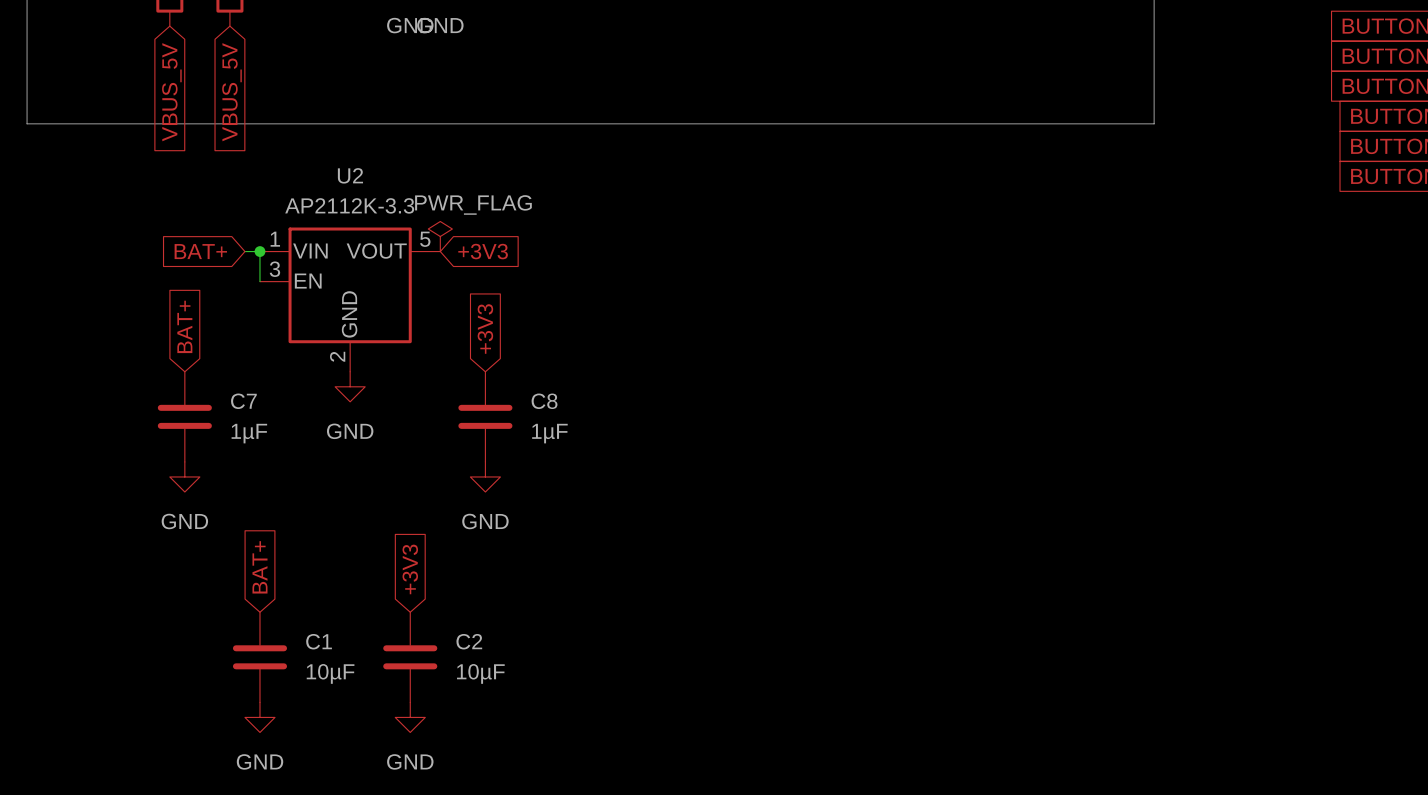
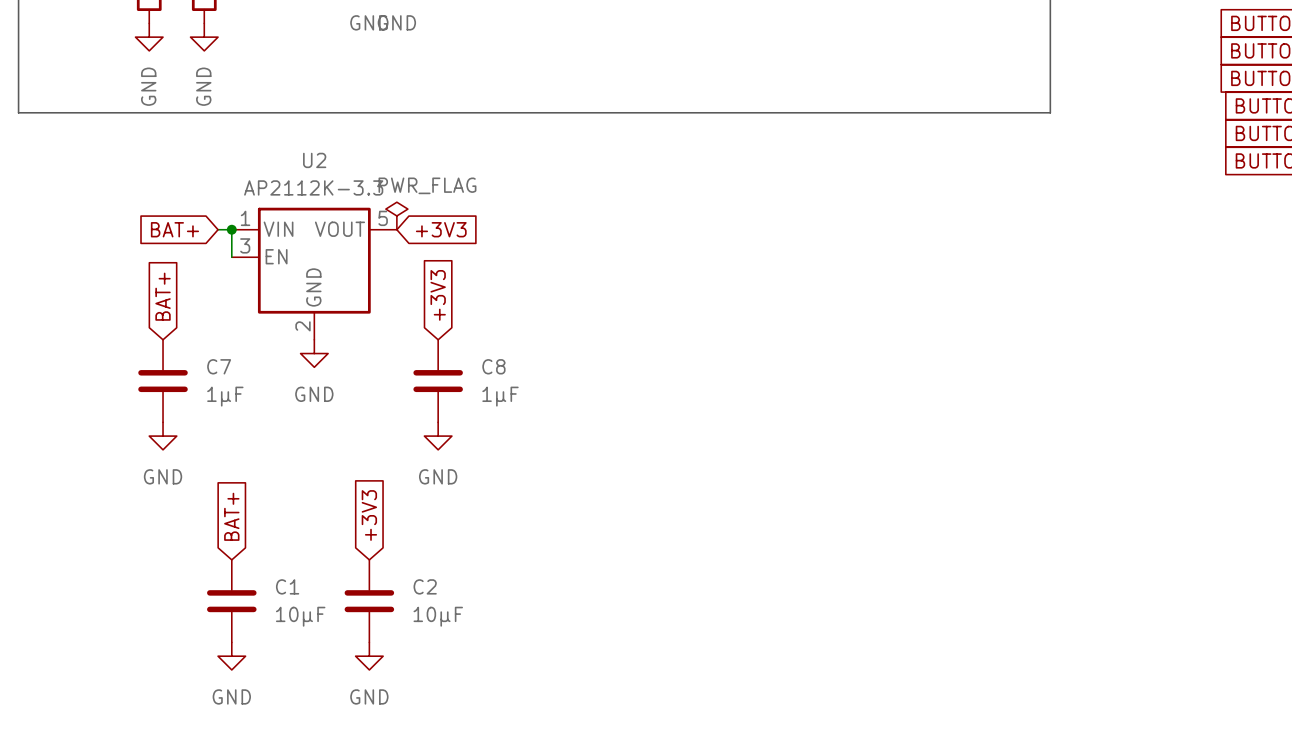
power symbol: none -> GND (149, 37)
power symbol: none -> GND (204, 37)
global label: VBUS_5V (171, 92) -> none
global label: VBUS_5V (231, 92) -> none

